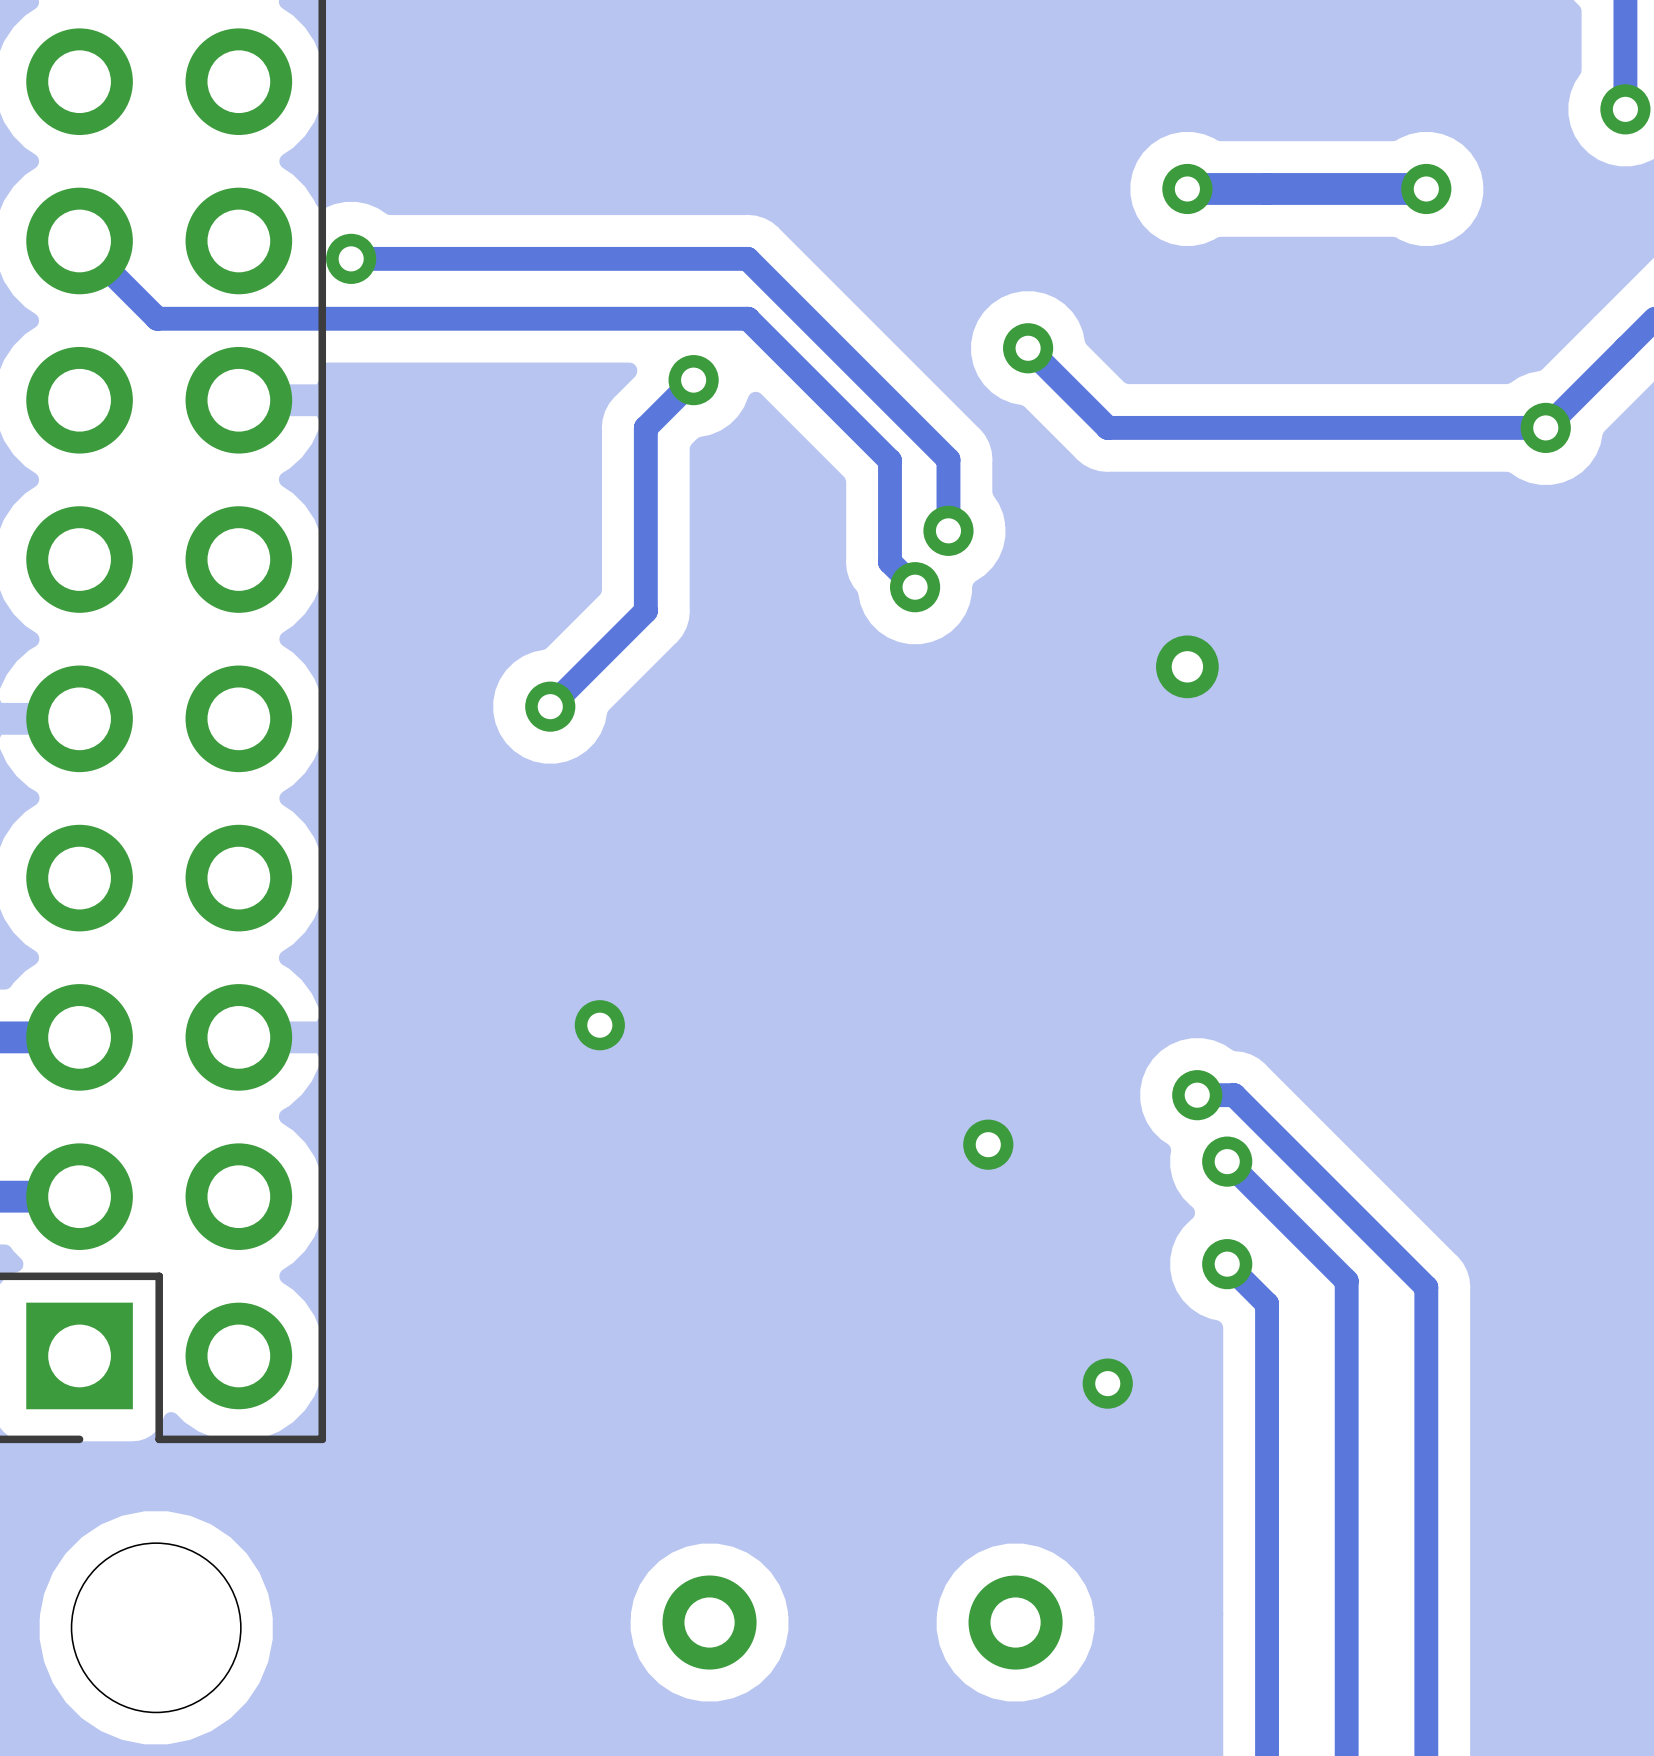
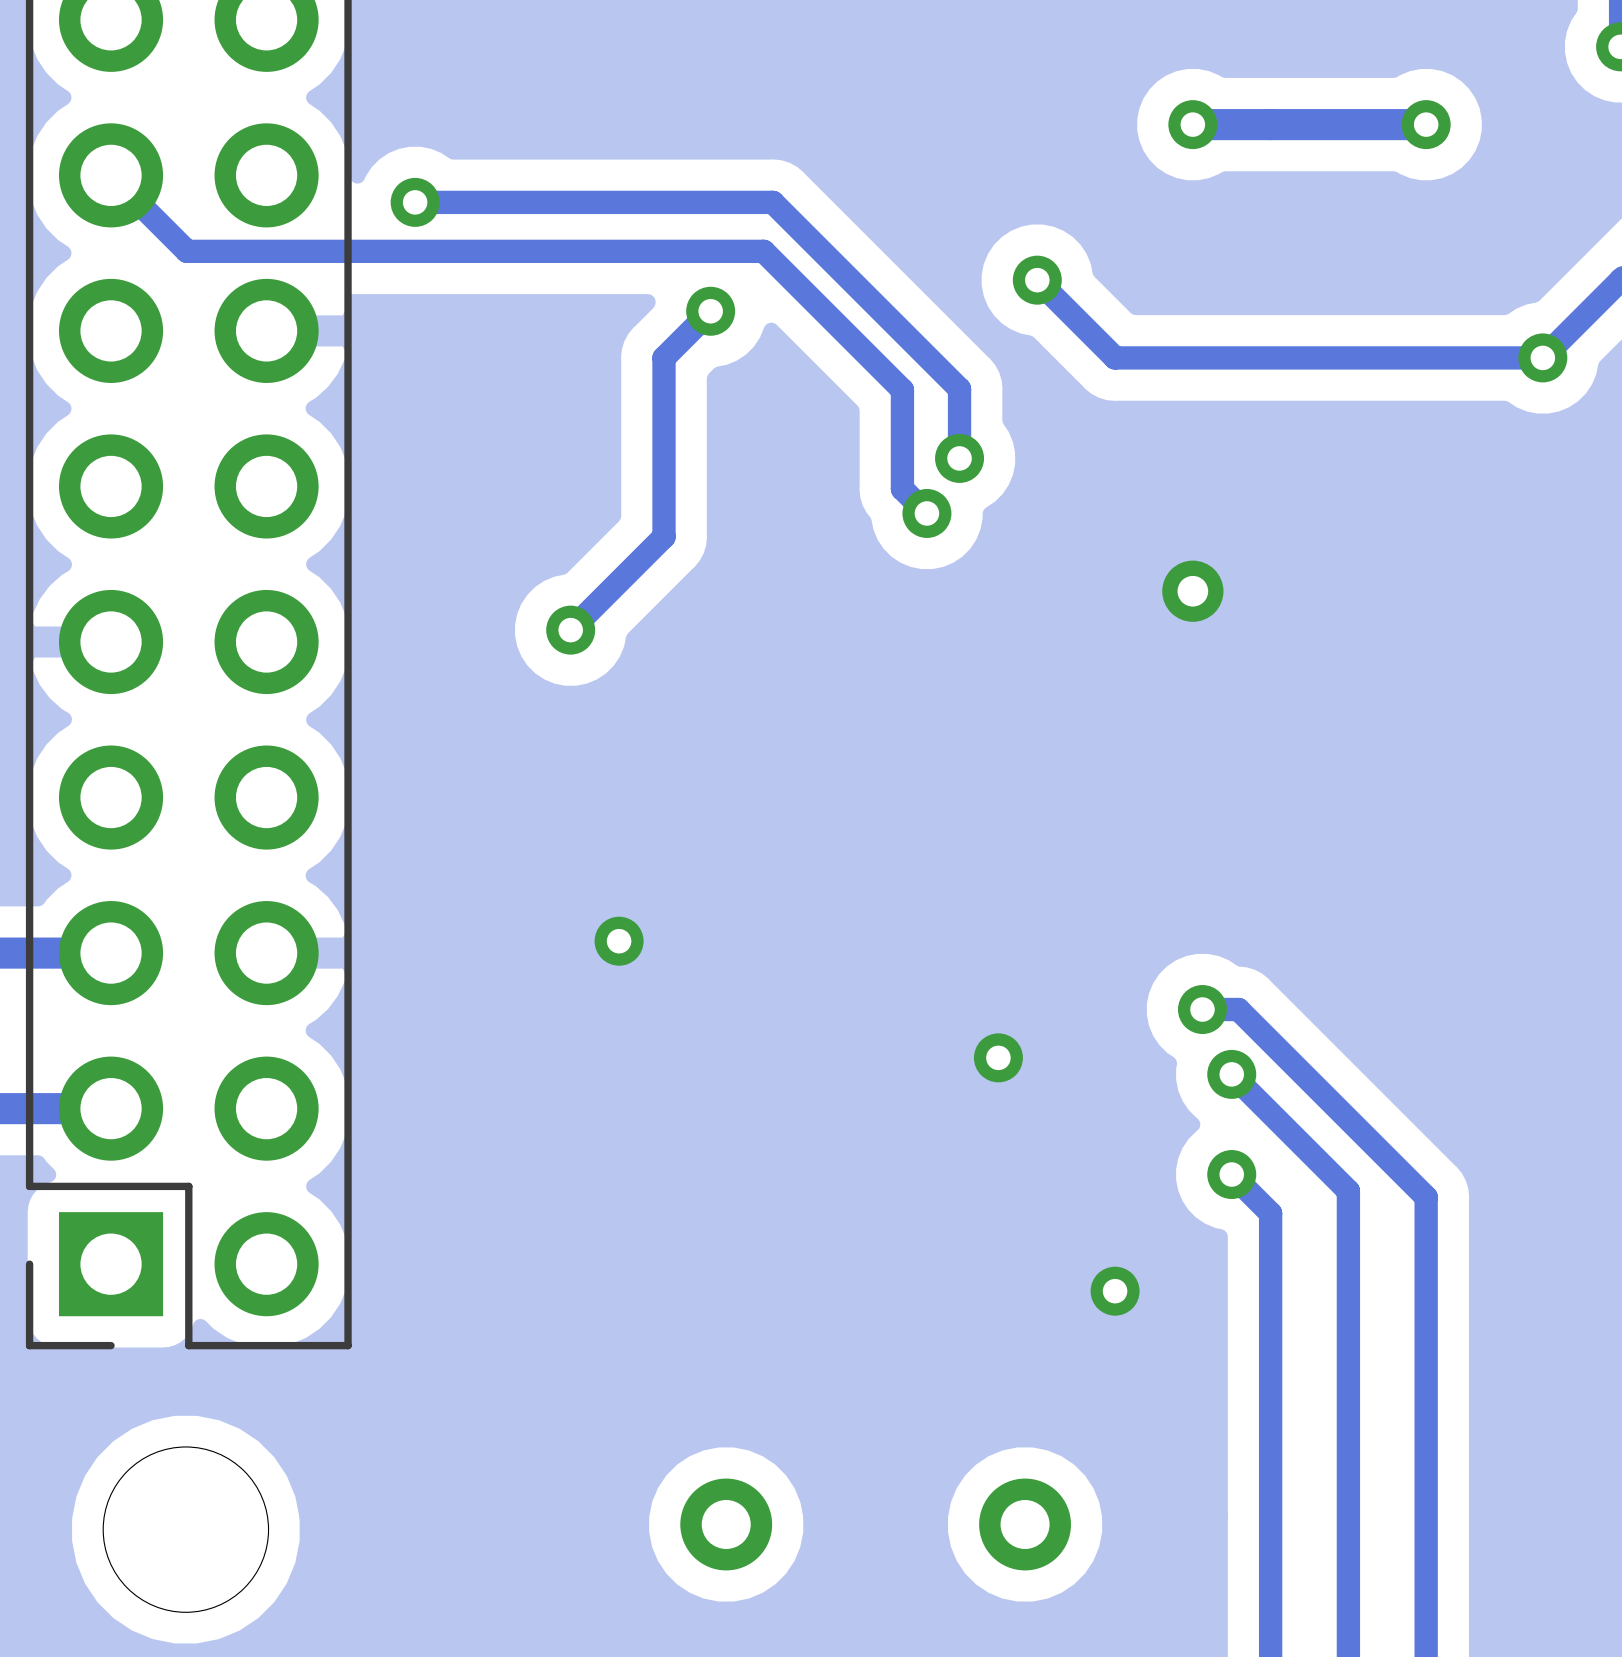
track: (351, 258) (747, 258) (757, 268) -> (415, 202) (772, 202)
via position: (351, 258) -> (415, 202)

